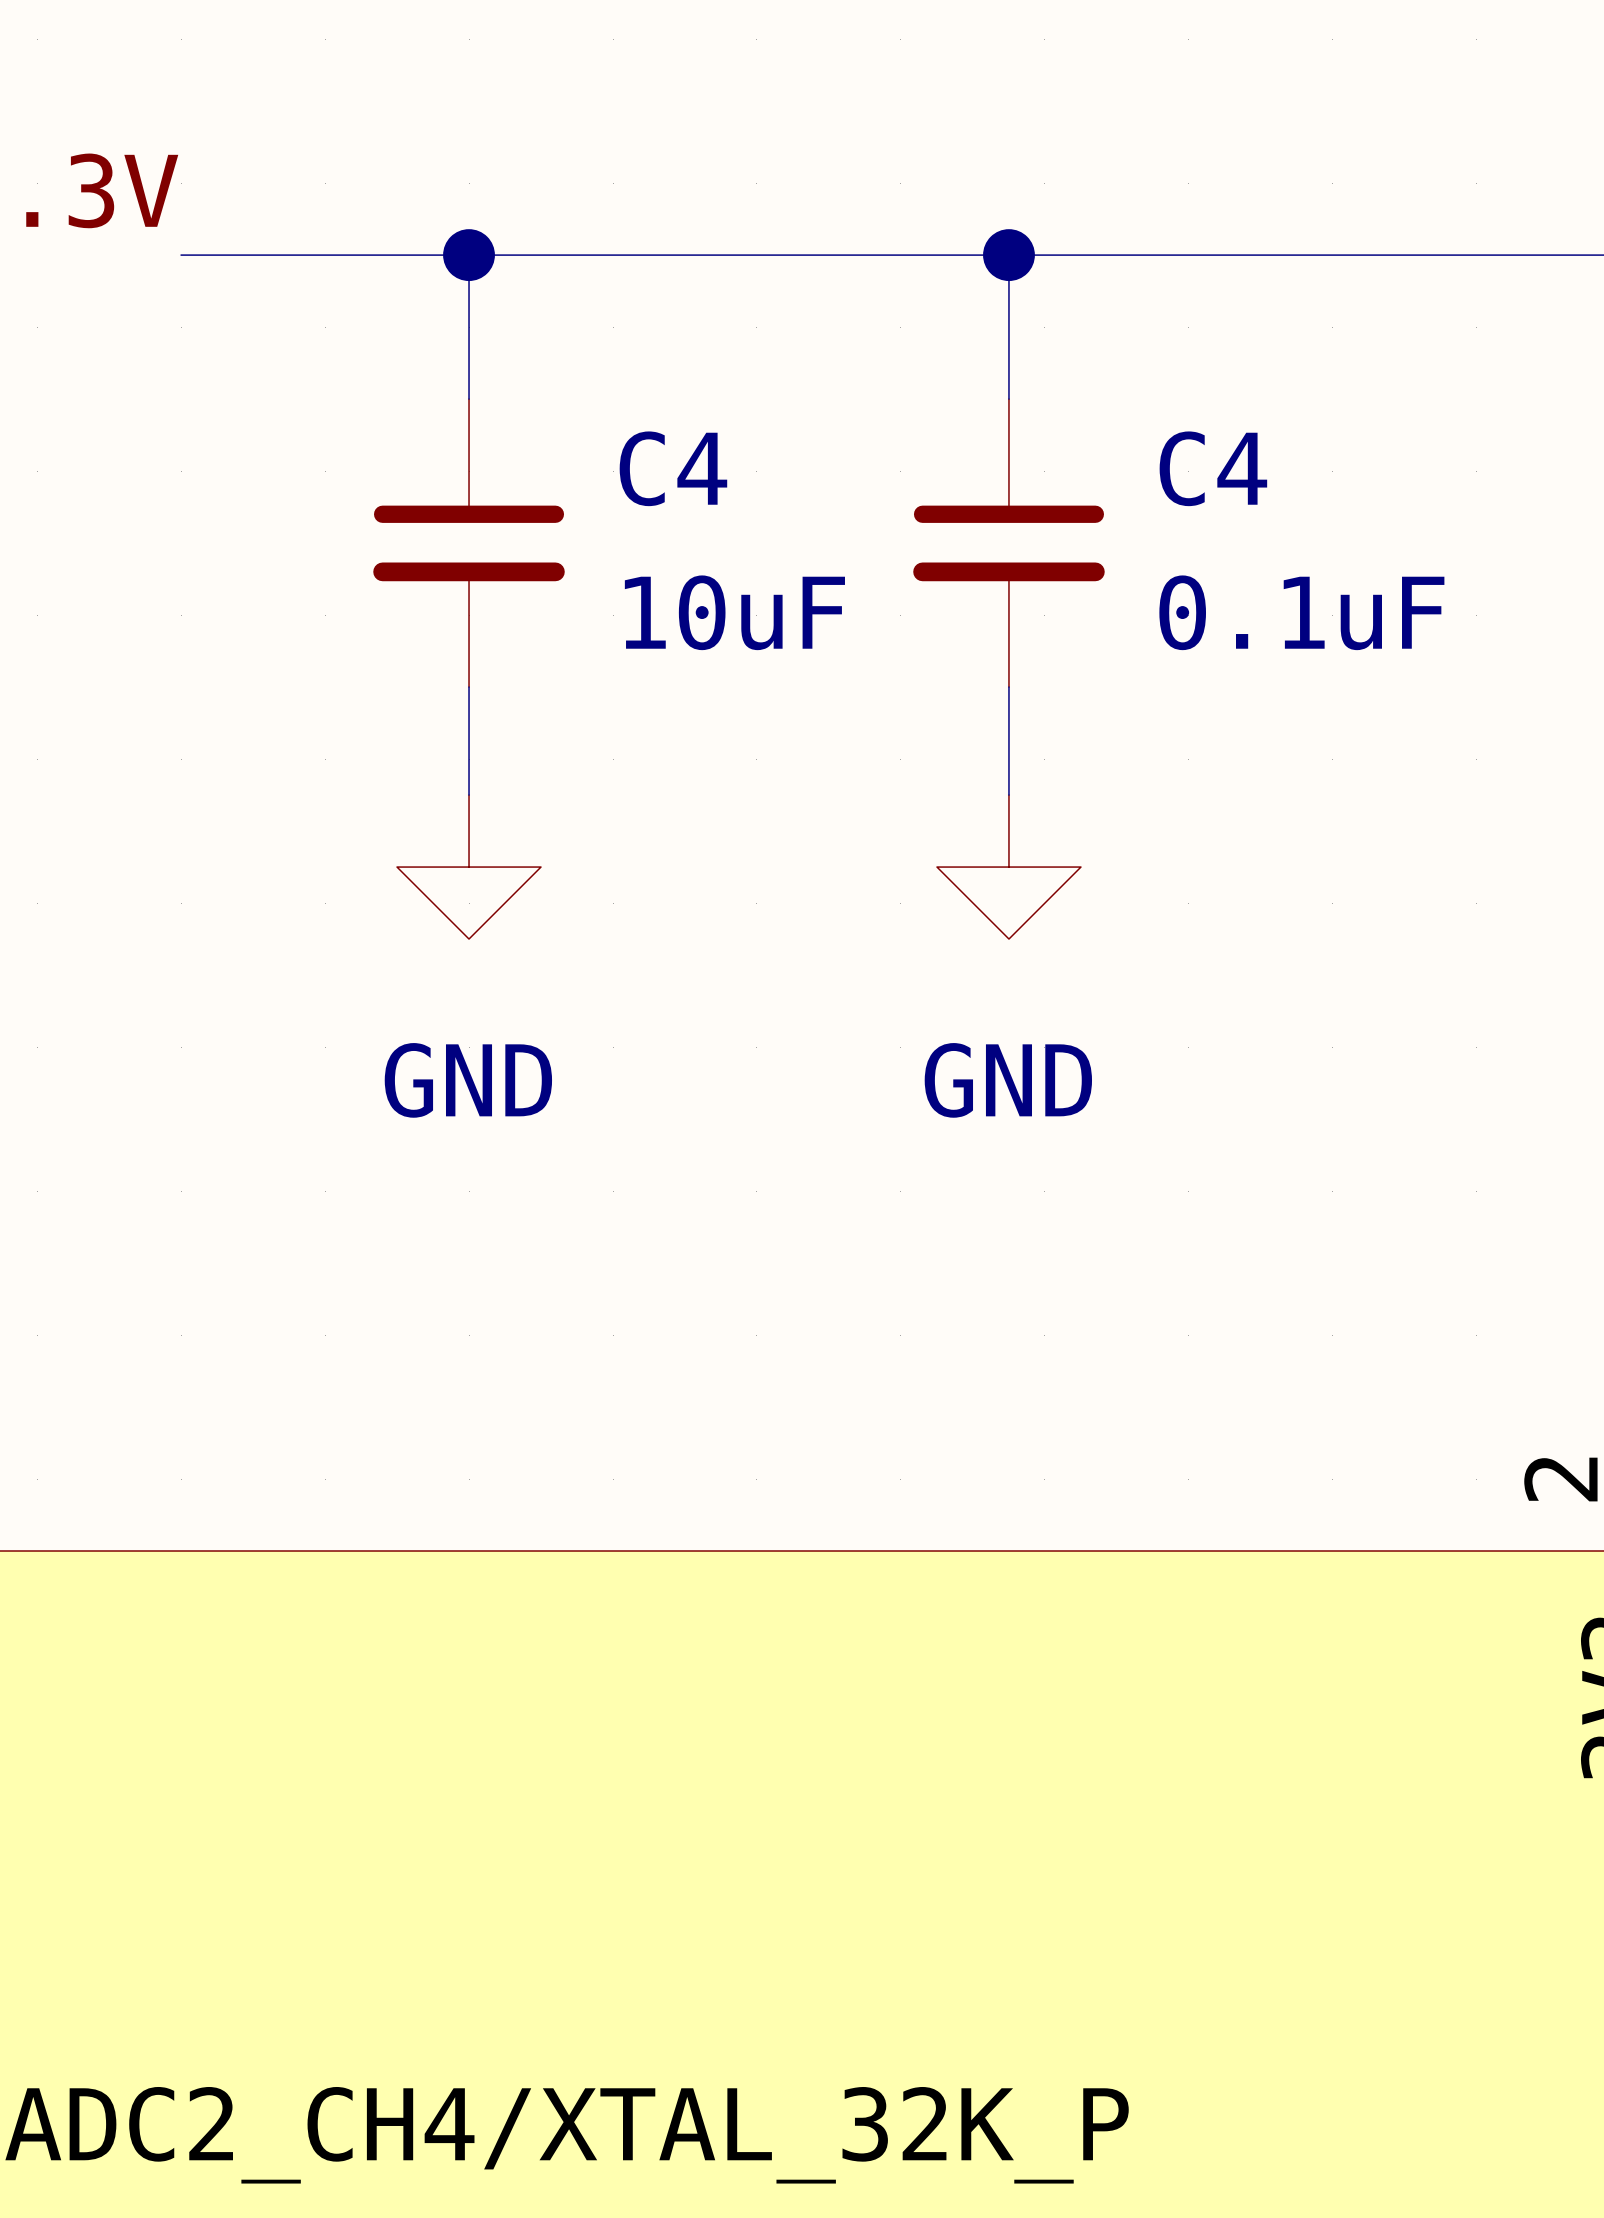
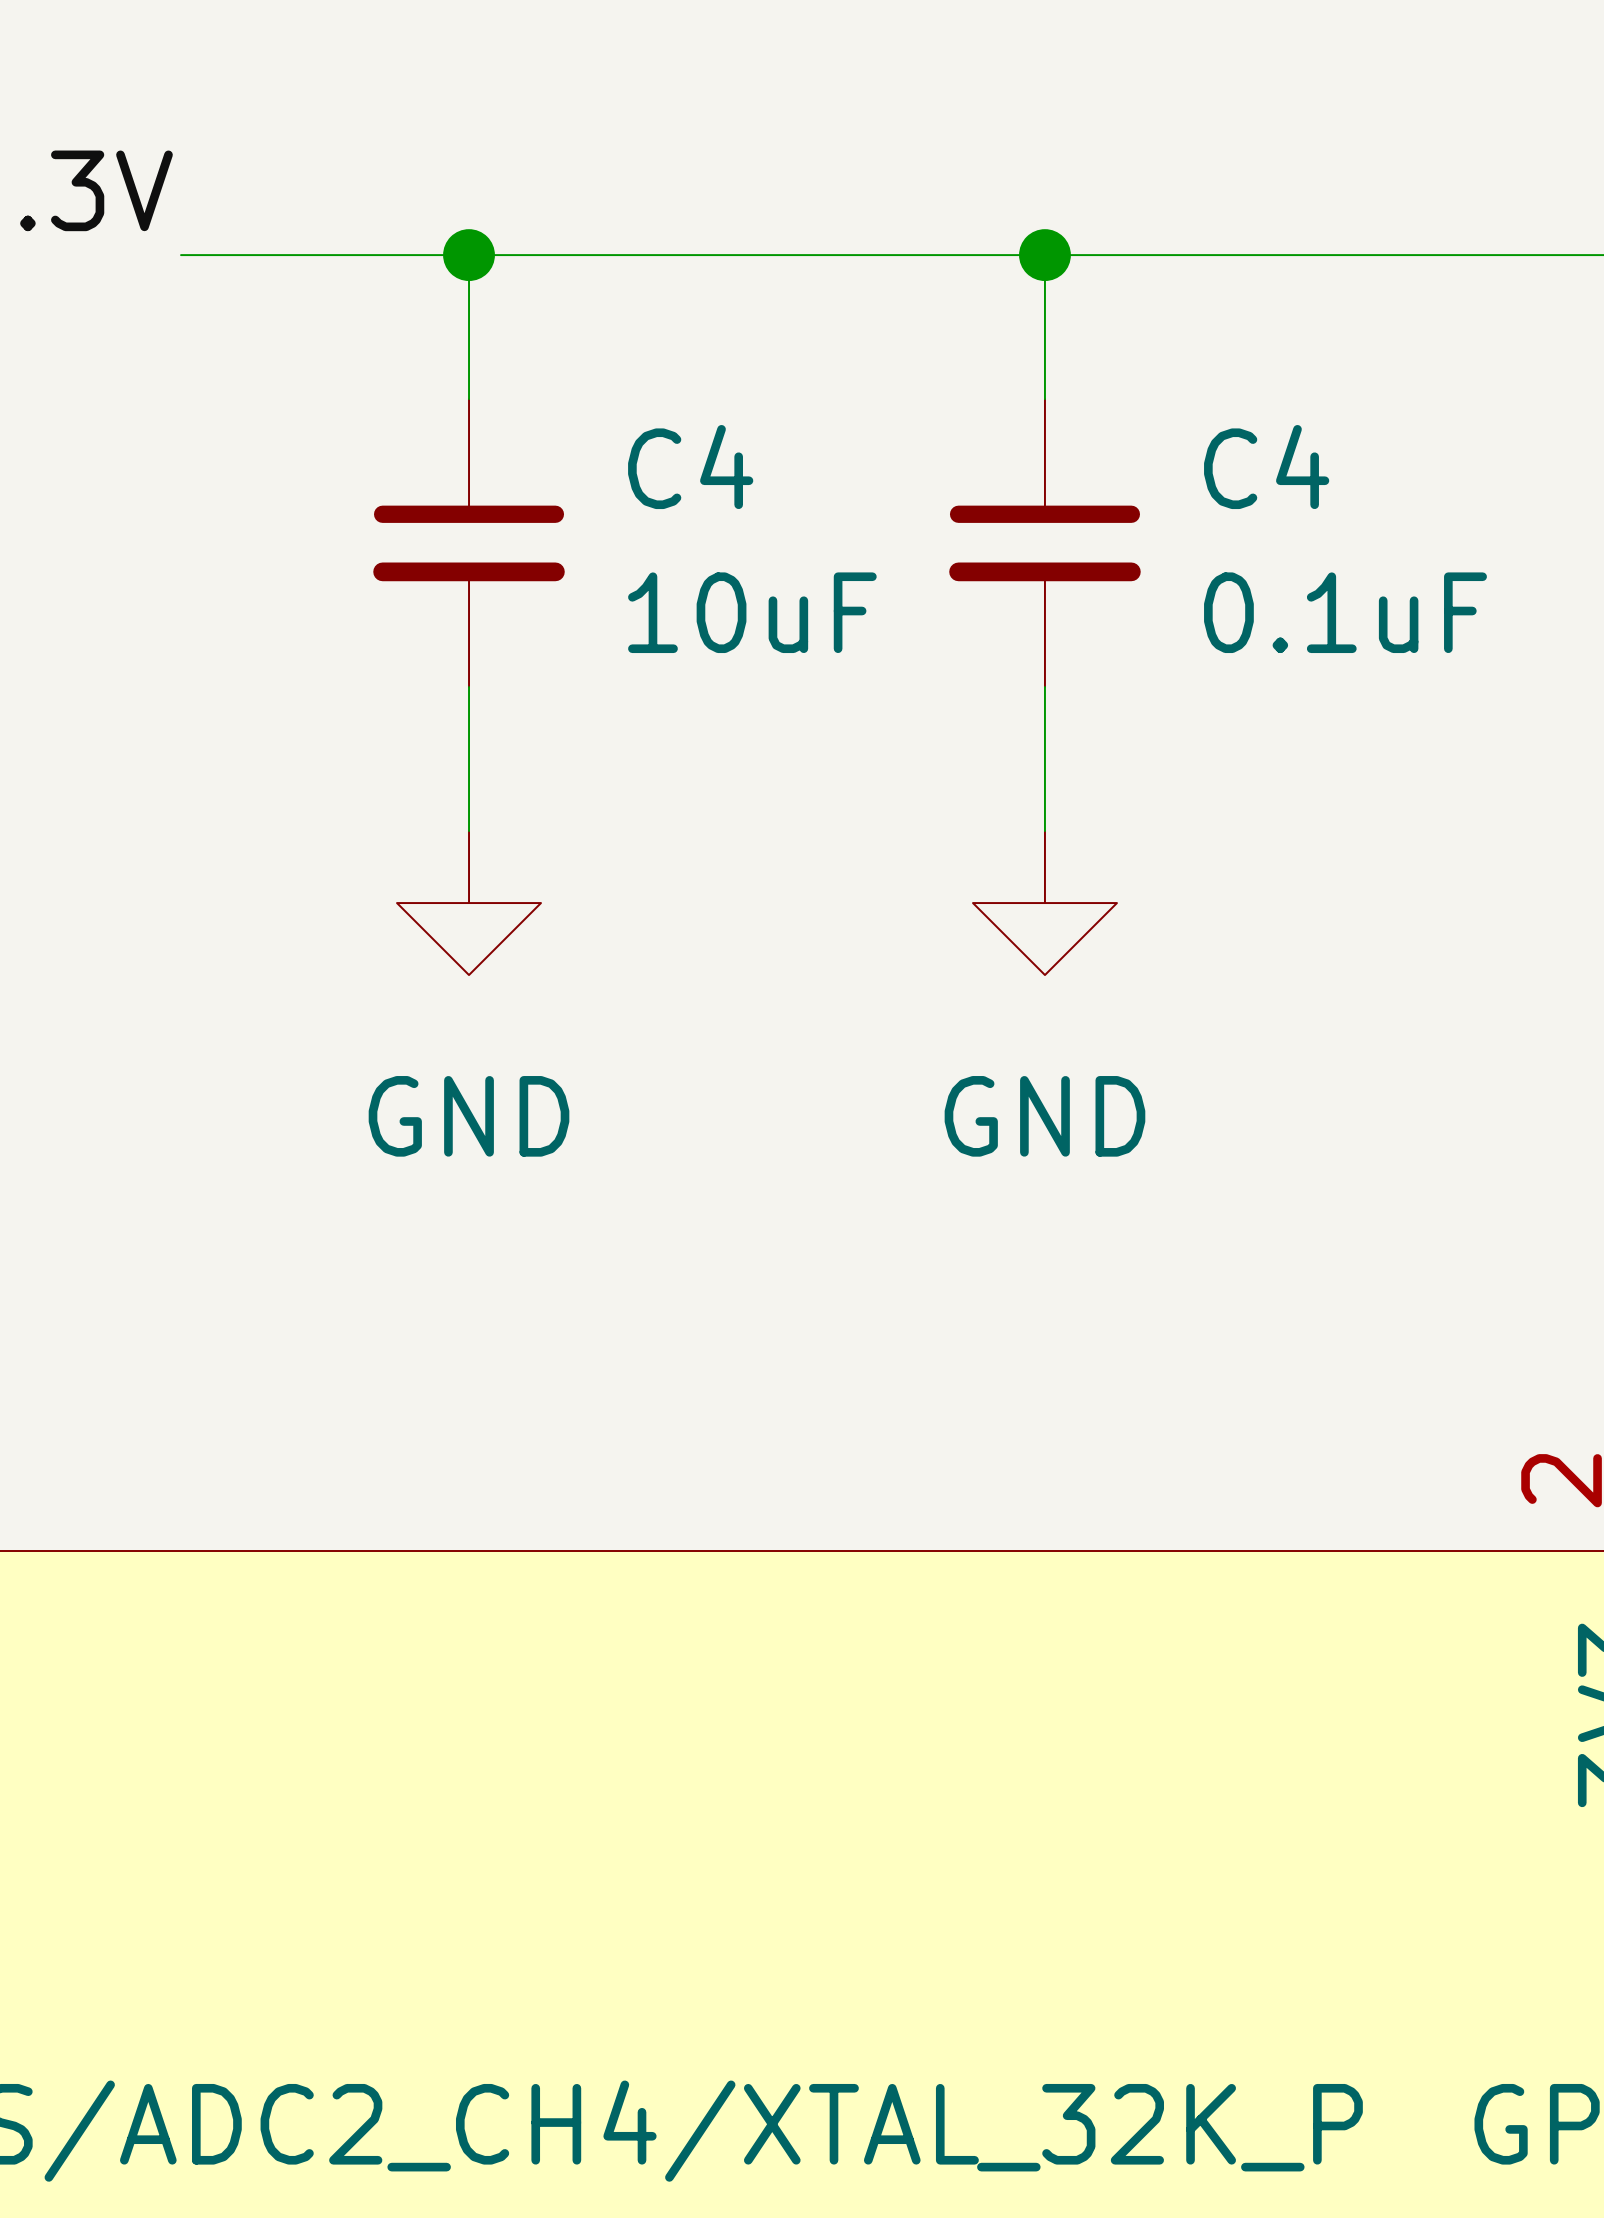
wire: (1008, 255) (1008, 399) -> (1044, 255) (1044, 399)
junction position: (1008, 255) -> (1044, 255)
C4 position: (1008, 543) -> (1044, 543)
wire: (1008, 687) (1008, 795) -> none
wire: none -> (1044, 687) (1044, 831)
power symbol position: GND (469, 867) -> GND (469, 903)
power symbol position: GND (1008, 867) -> GND (1044, 903)

